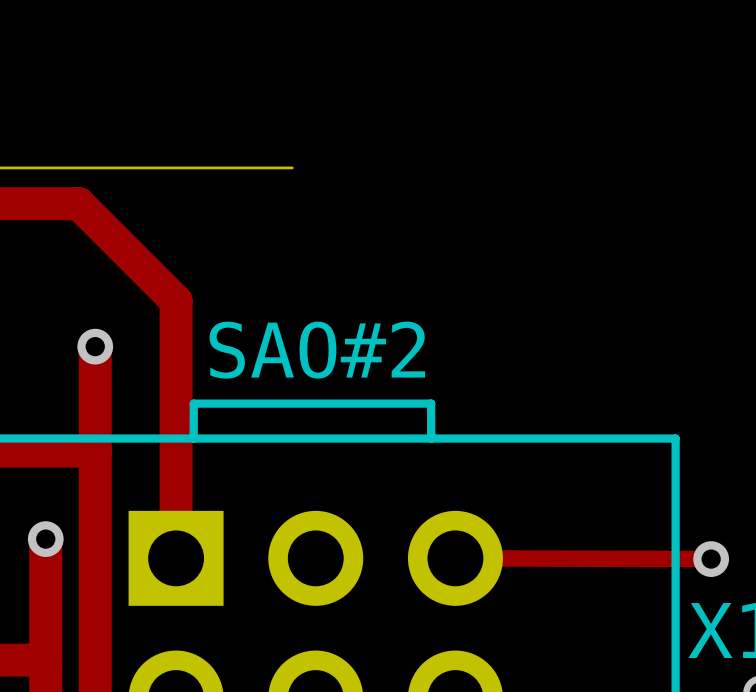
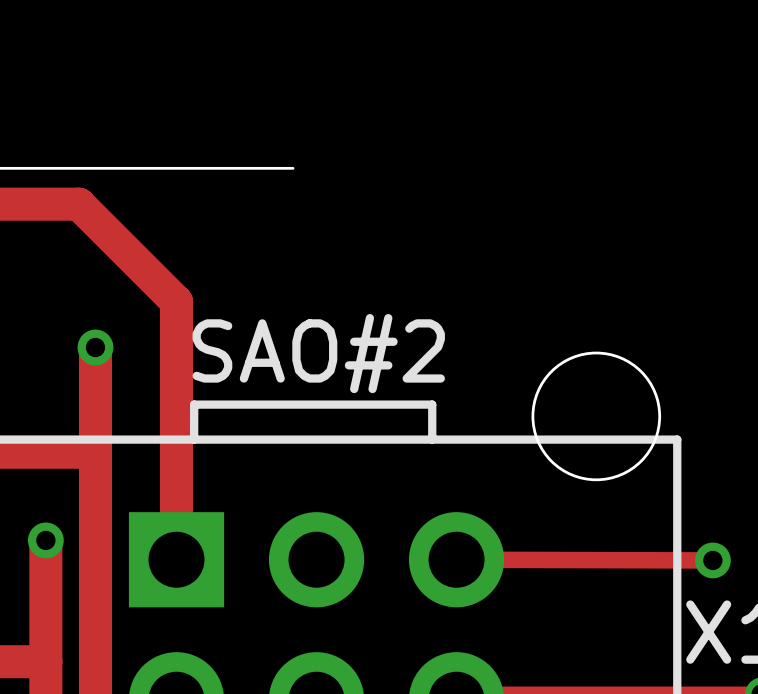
round board edge: none -> [531, 351, 662, 482]

